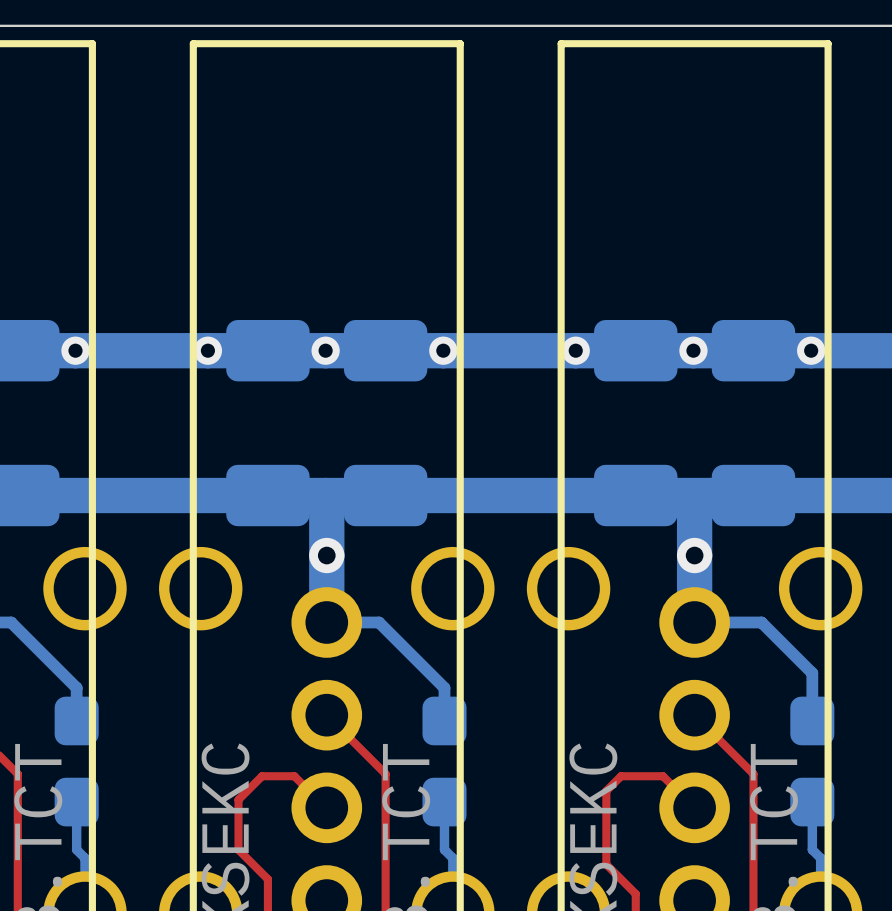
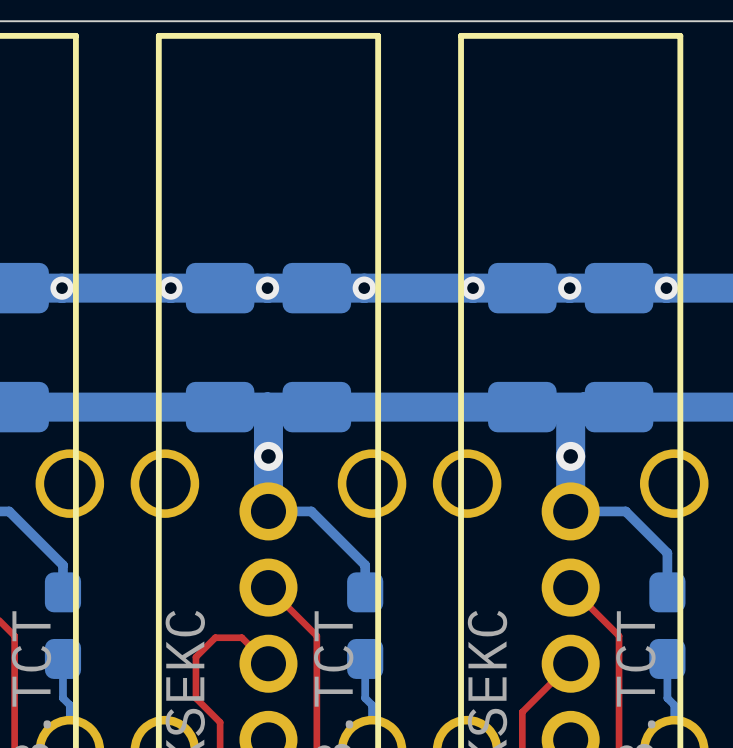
top track: (694, 807) (662, 776) (621, 776) (606, 790) (606, 864) (635, 893) -> (570, 663) (522, 712) (522, 734)

